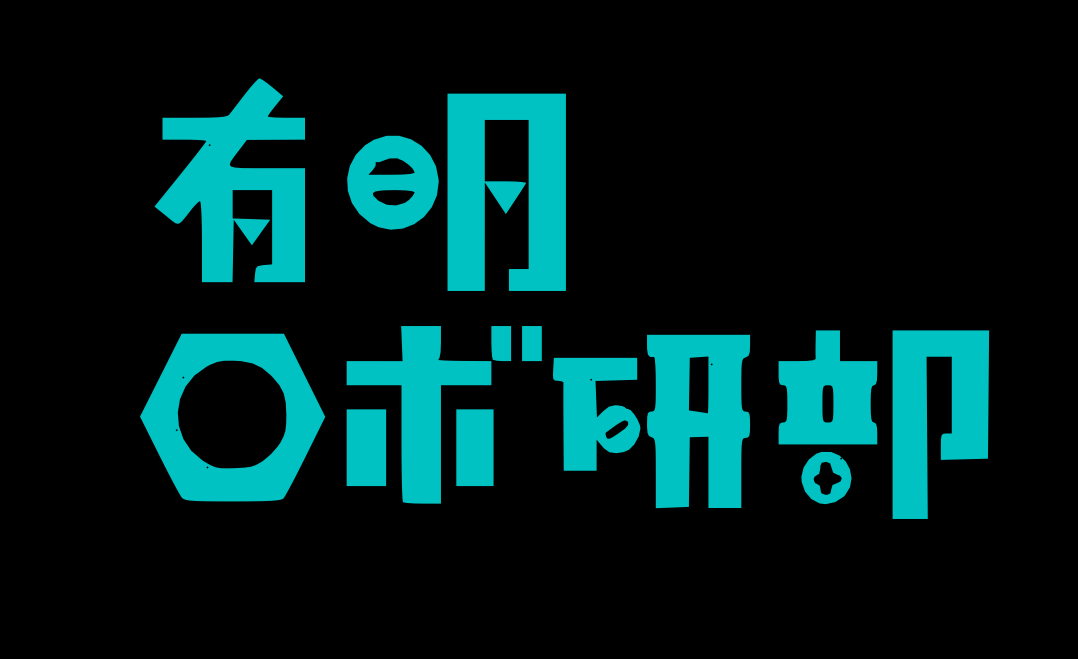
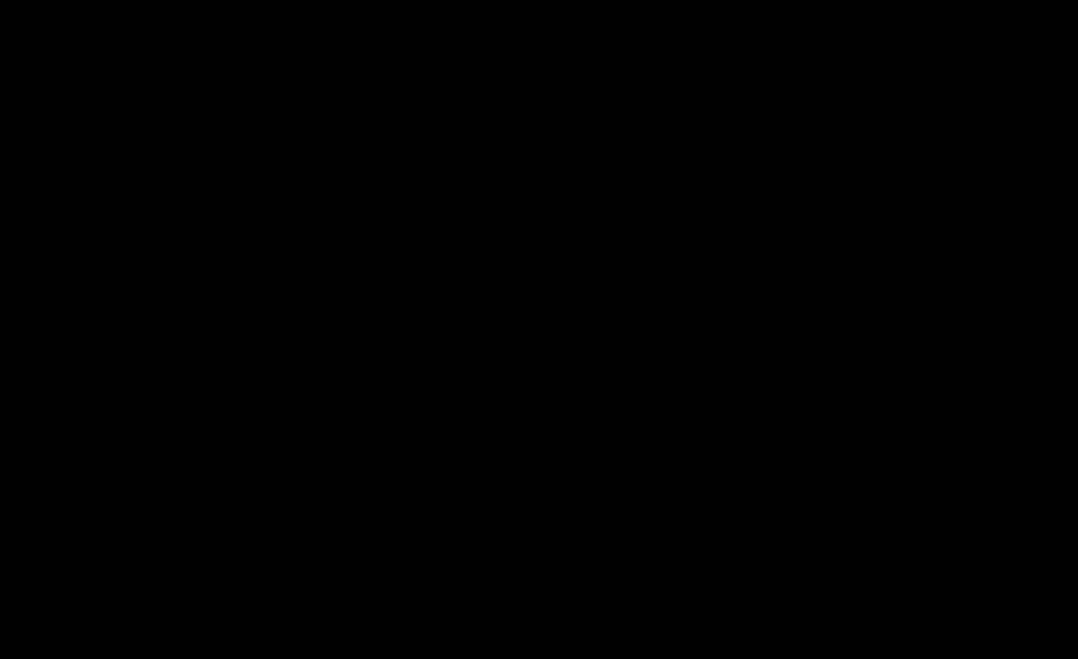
drawing: [140, 78, 990, 519] -> none

